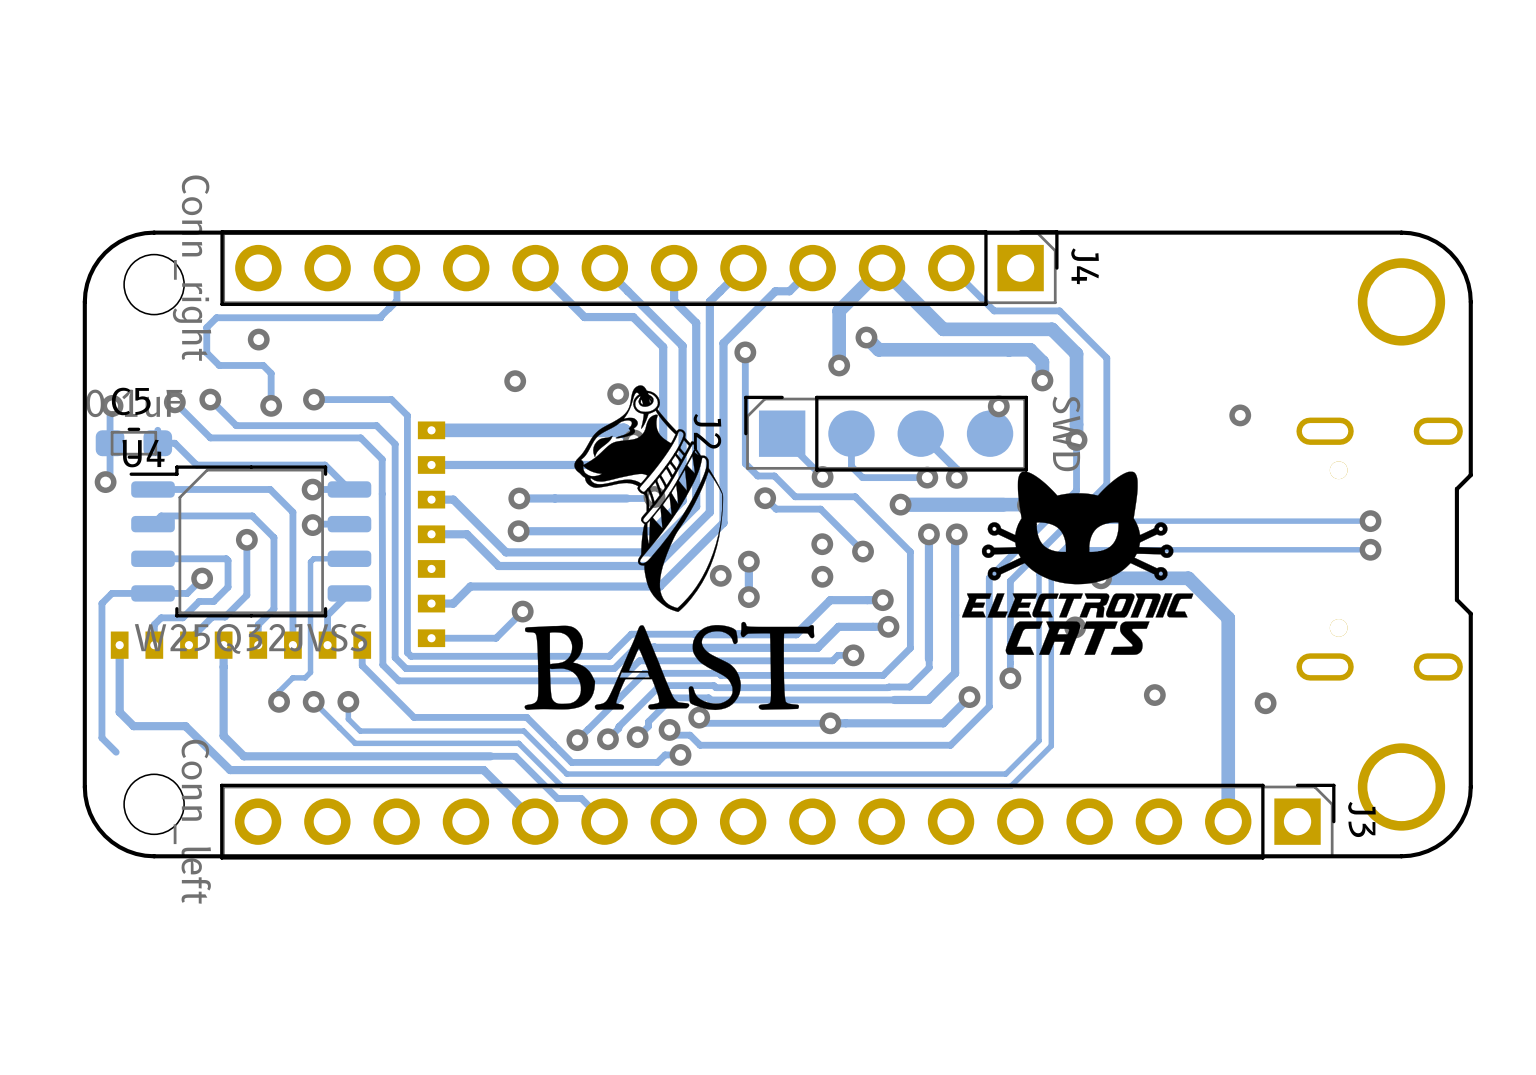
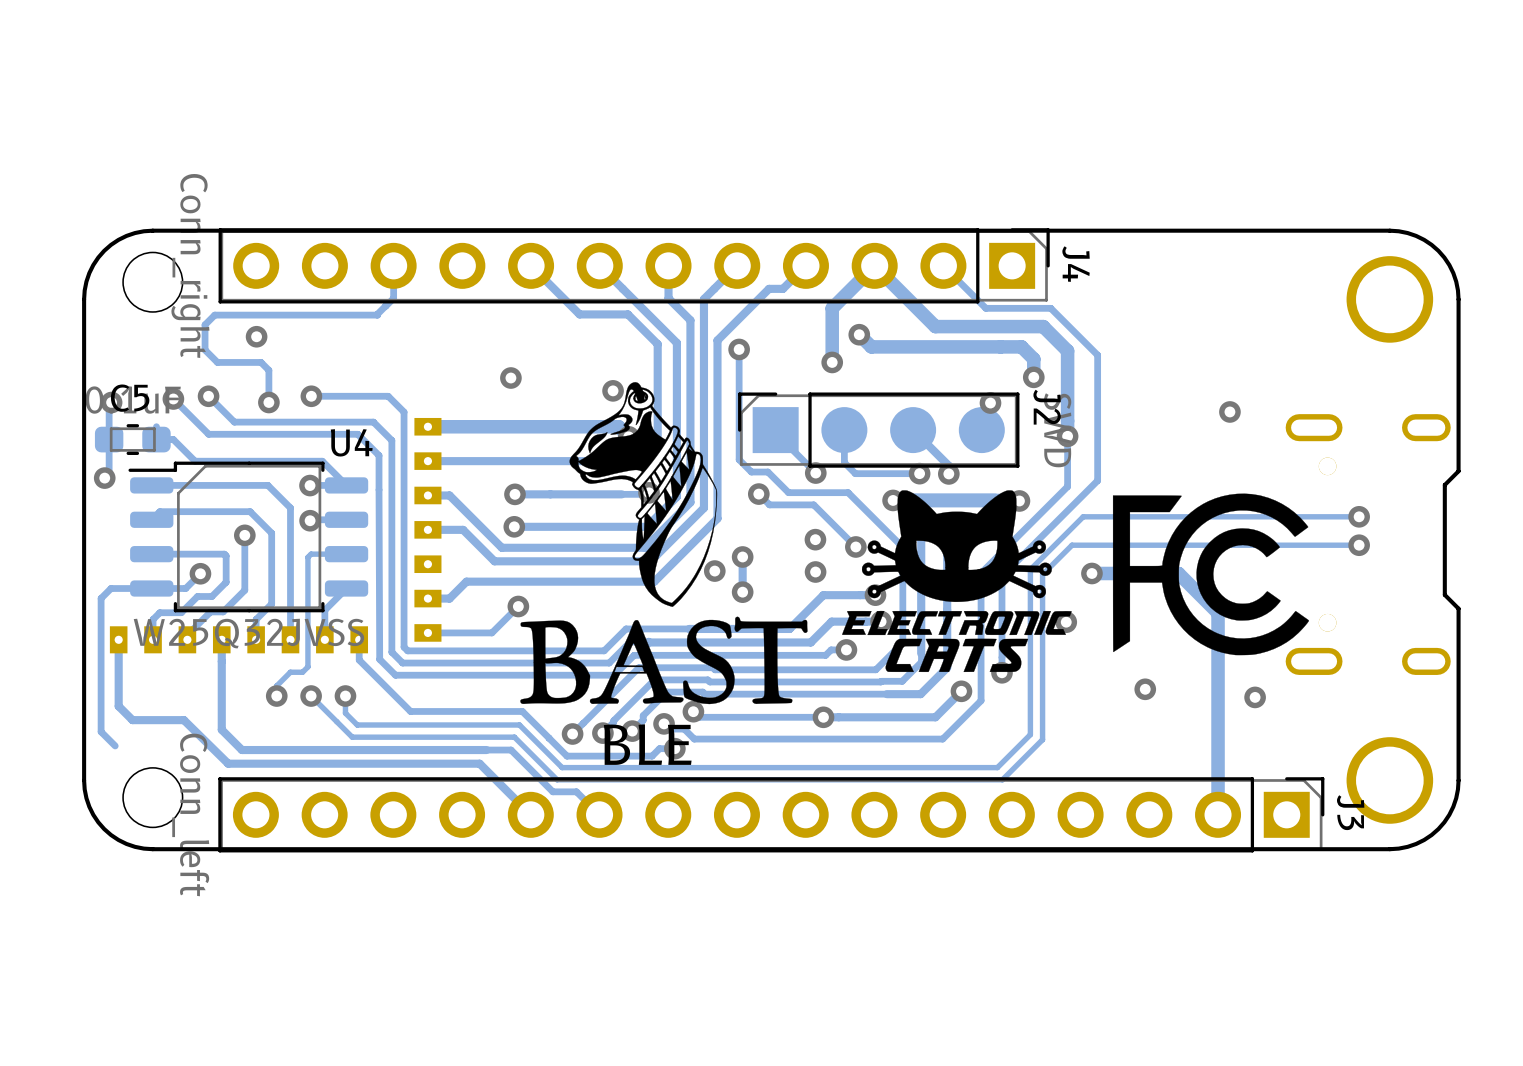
J2 name position: J2 (707, 431) -> J2 (1047, 407)
U4 name position: U4 (143, 453) -> U4 (351, 442)
drawing: none -> [1112, 493, 1310, 656]
drawing position: (1077, 563) -> (956, 581)
text: none -> BLE (647, 744)

